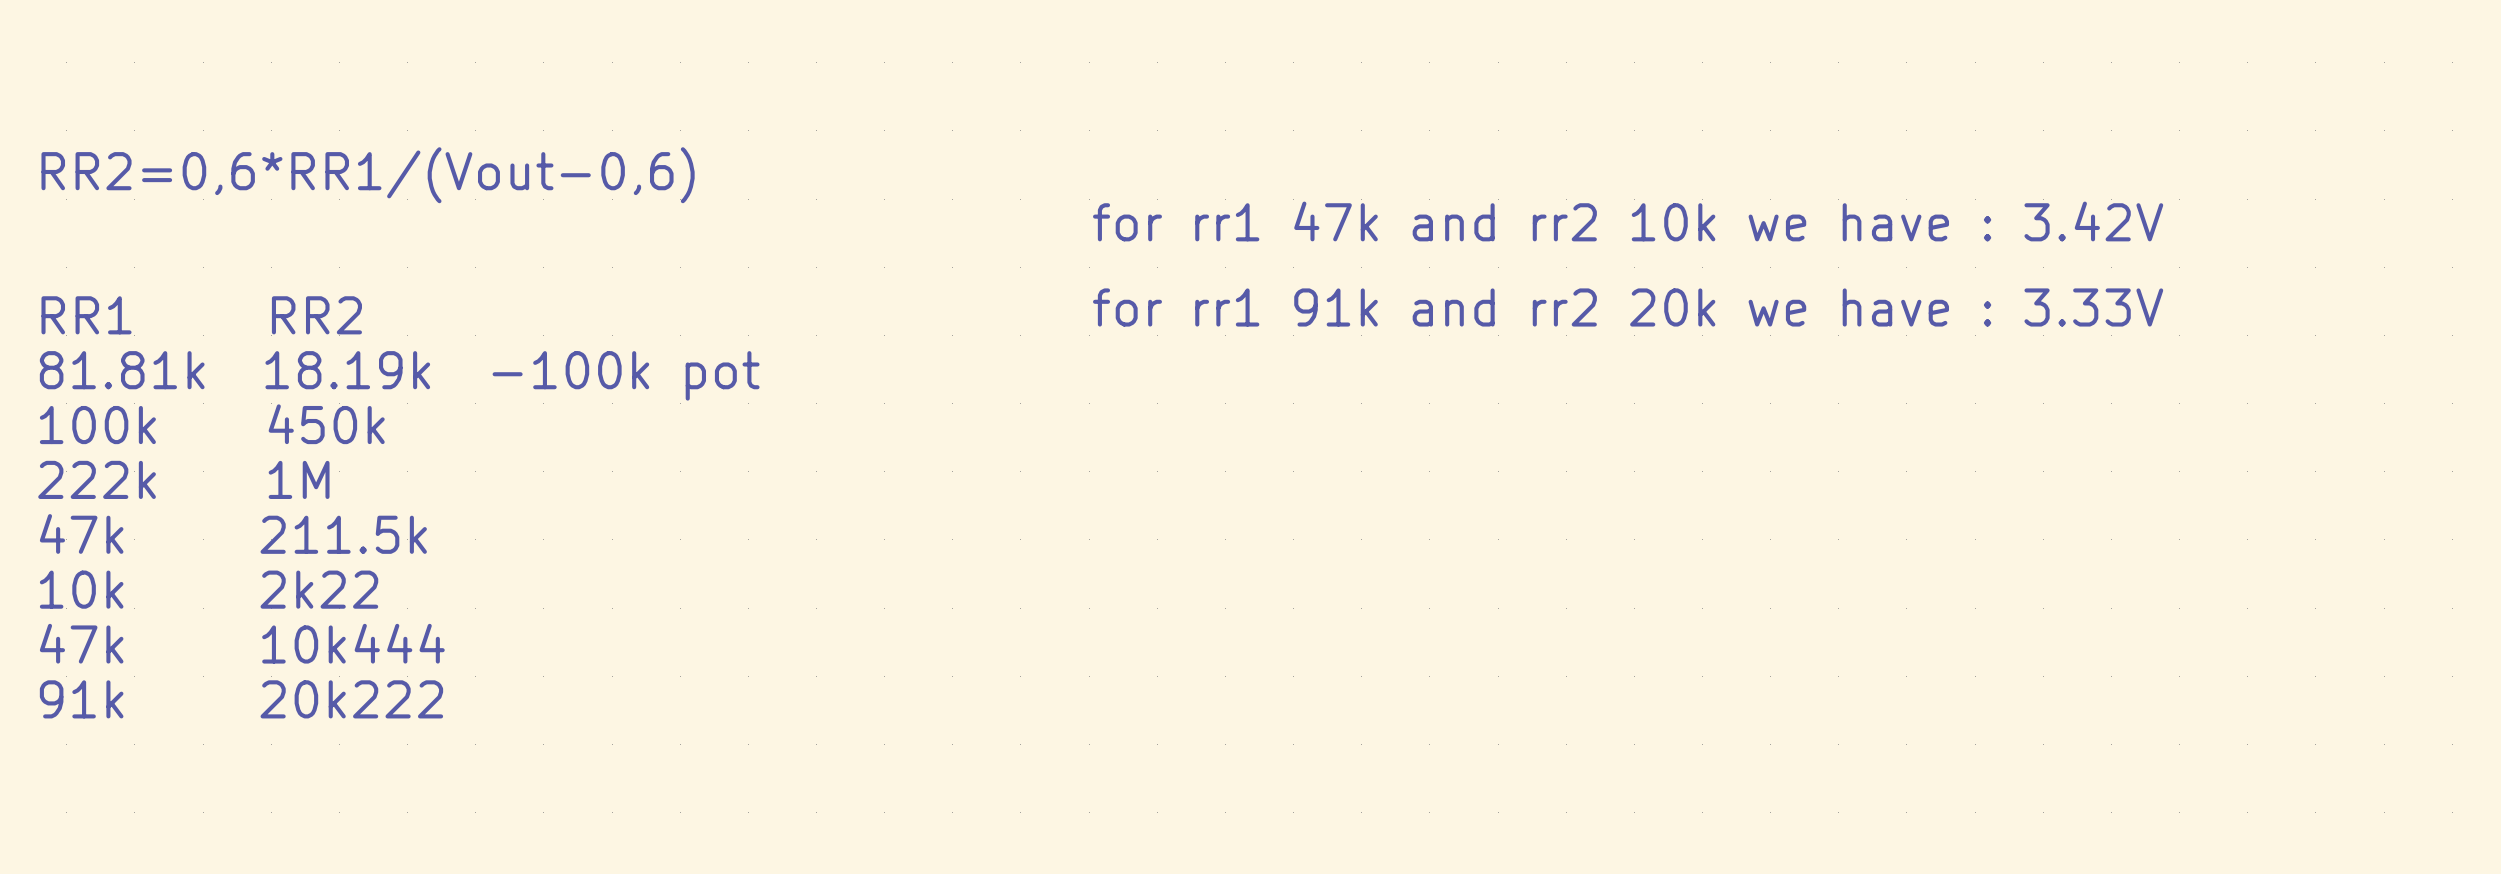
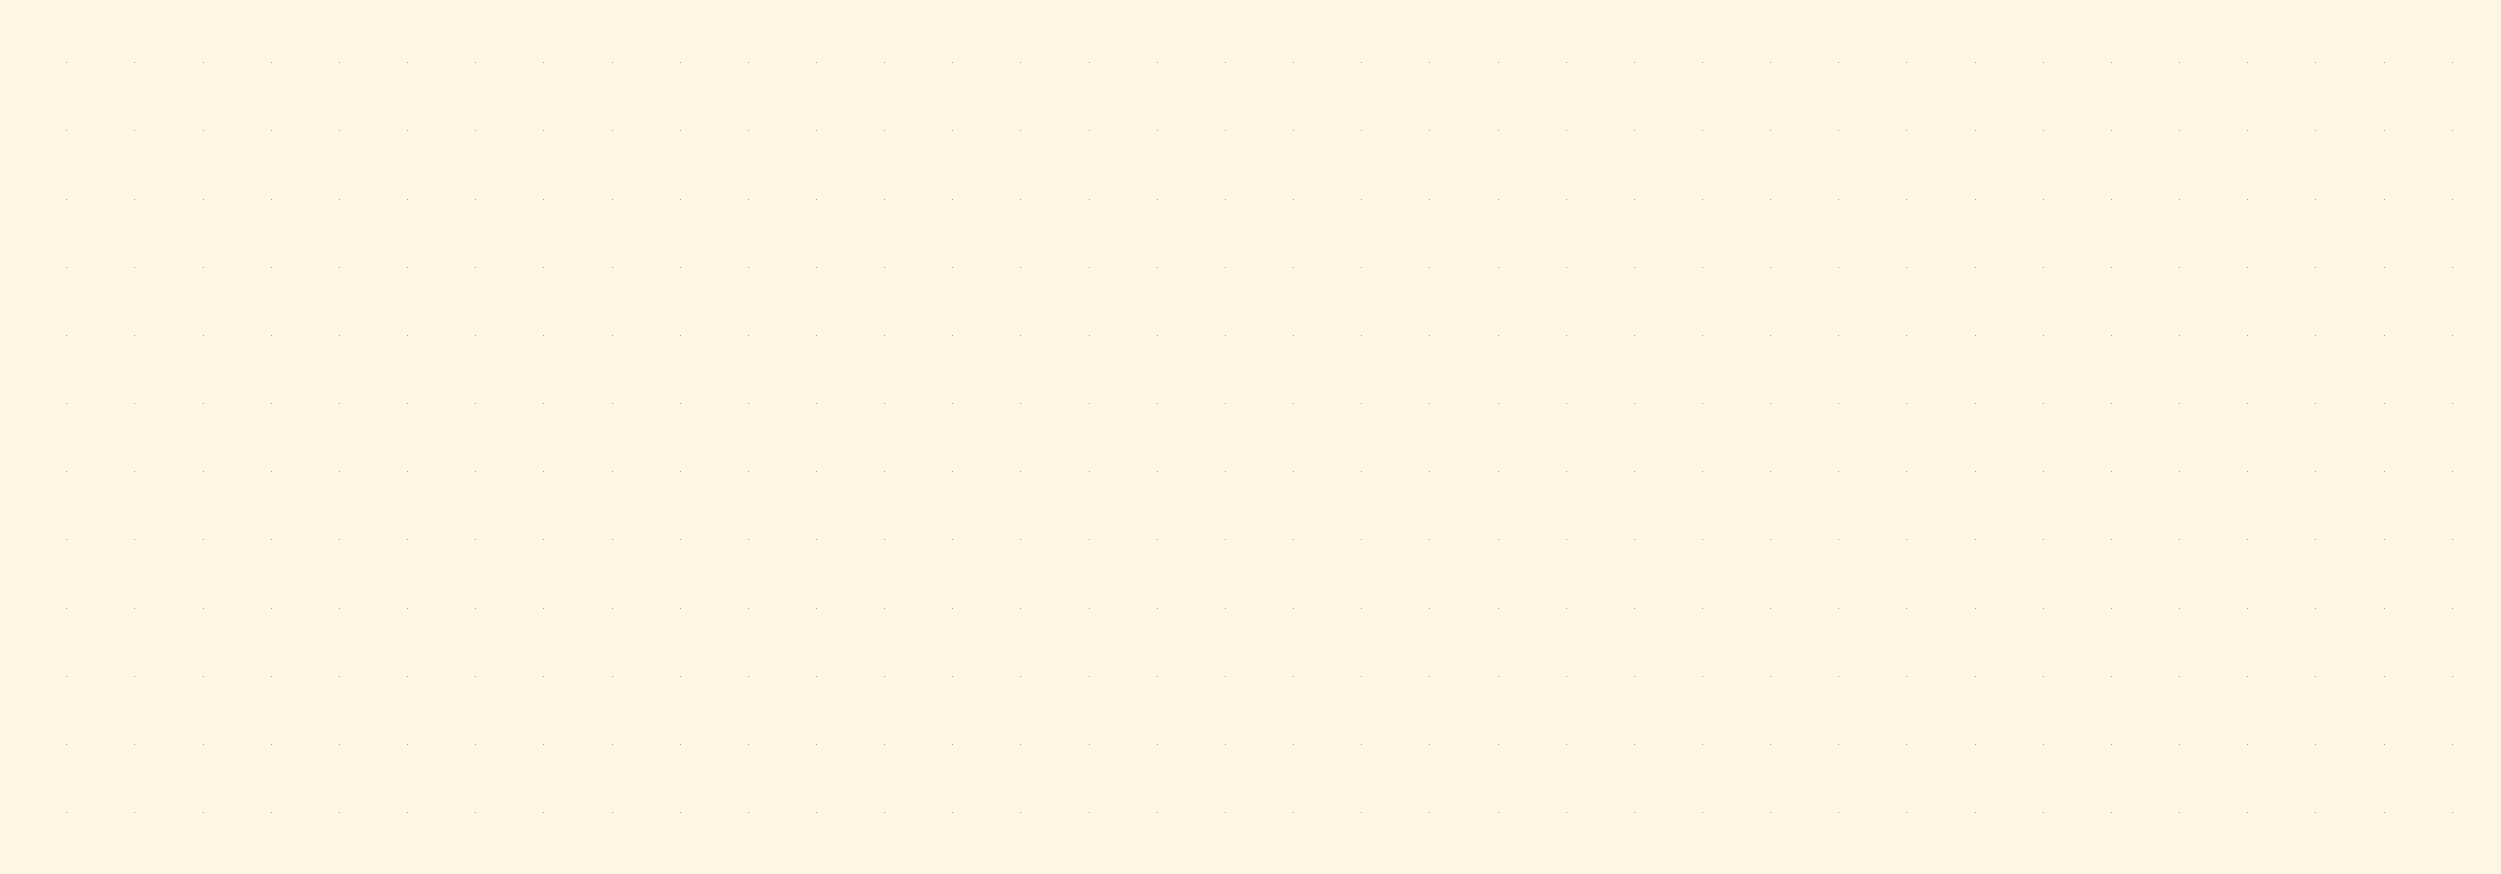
text: RR2=0,6*RR1/(Vout-0,6) (368, 175) -> none
text: for rr1 47k and rr2 10k we have : 3.42V (1628, 221) -> none
text: for rr1 91k and rr2 20k we have : 3.33V (1628, 307) -> none
text: RR1 RR2 (201, 315) -> none
text: 81.81k 18.19k -100k pot (399, 375) -> none
text: 100k 450k (212, 424) -> none
text: 222k 1M (183, 479) -> none
text: 47k 211.5k (233, 533) -> none
text: 10k 2k22 (209, 589) -> none
text: 47k 10k444 (242, 643) -> none
text: 91k 20k222 (241, 699) -> none

